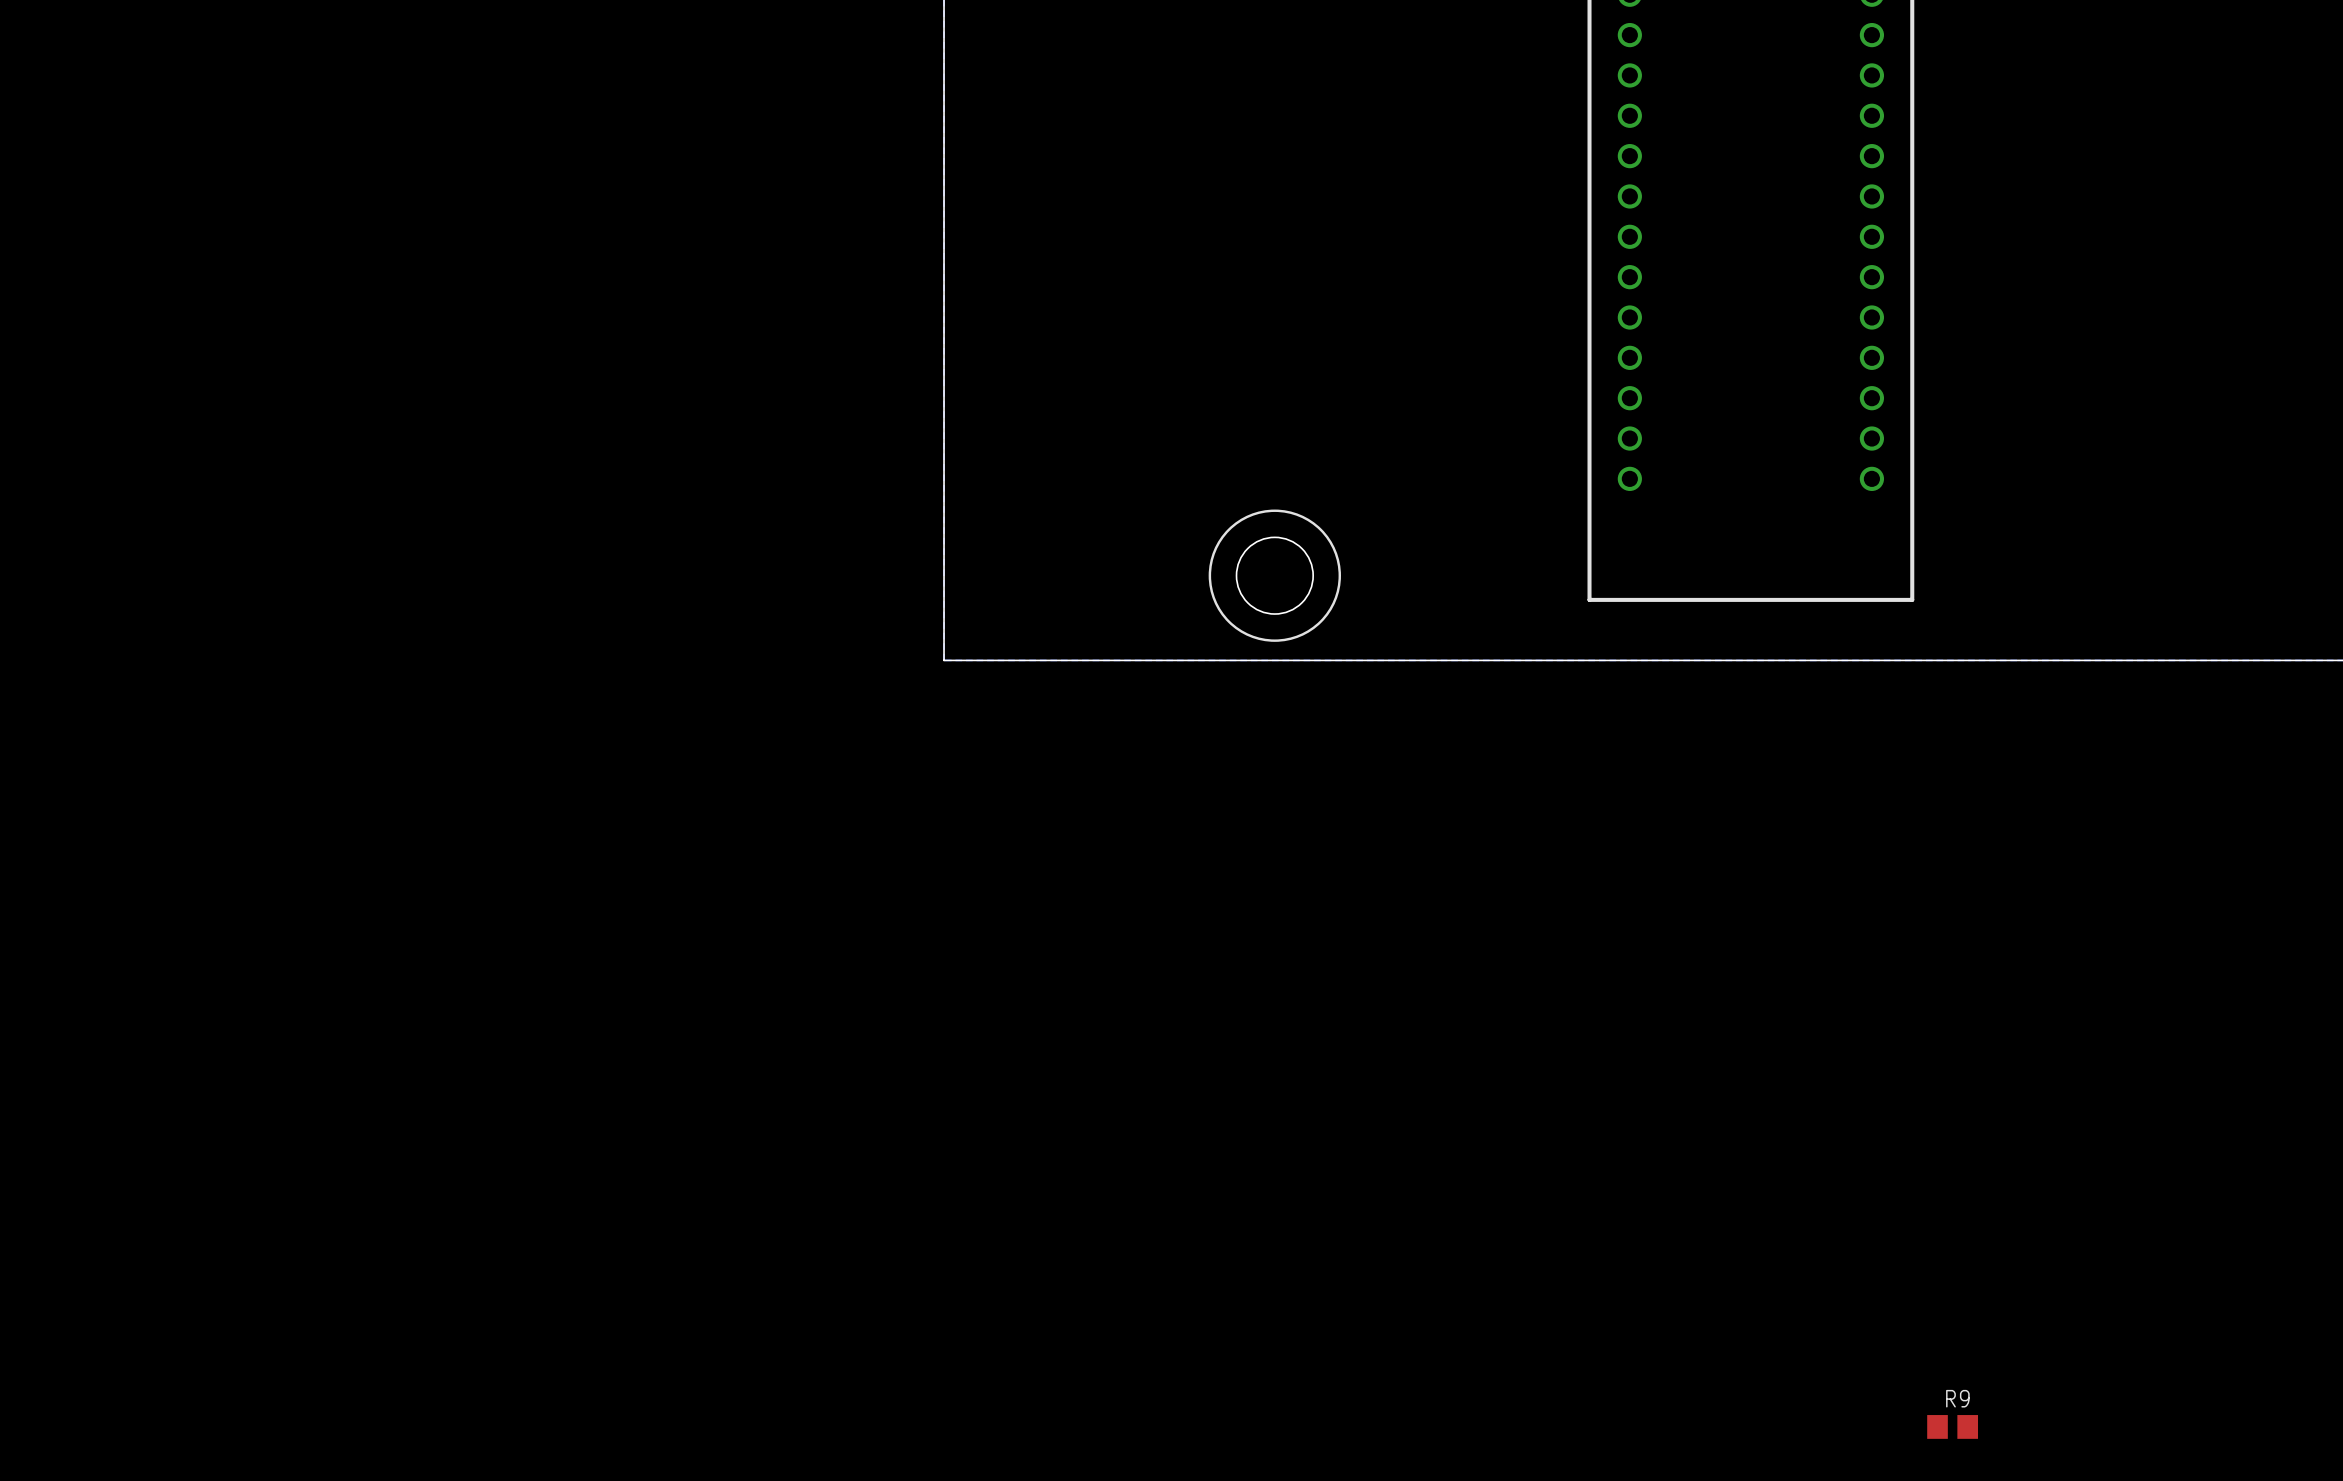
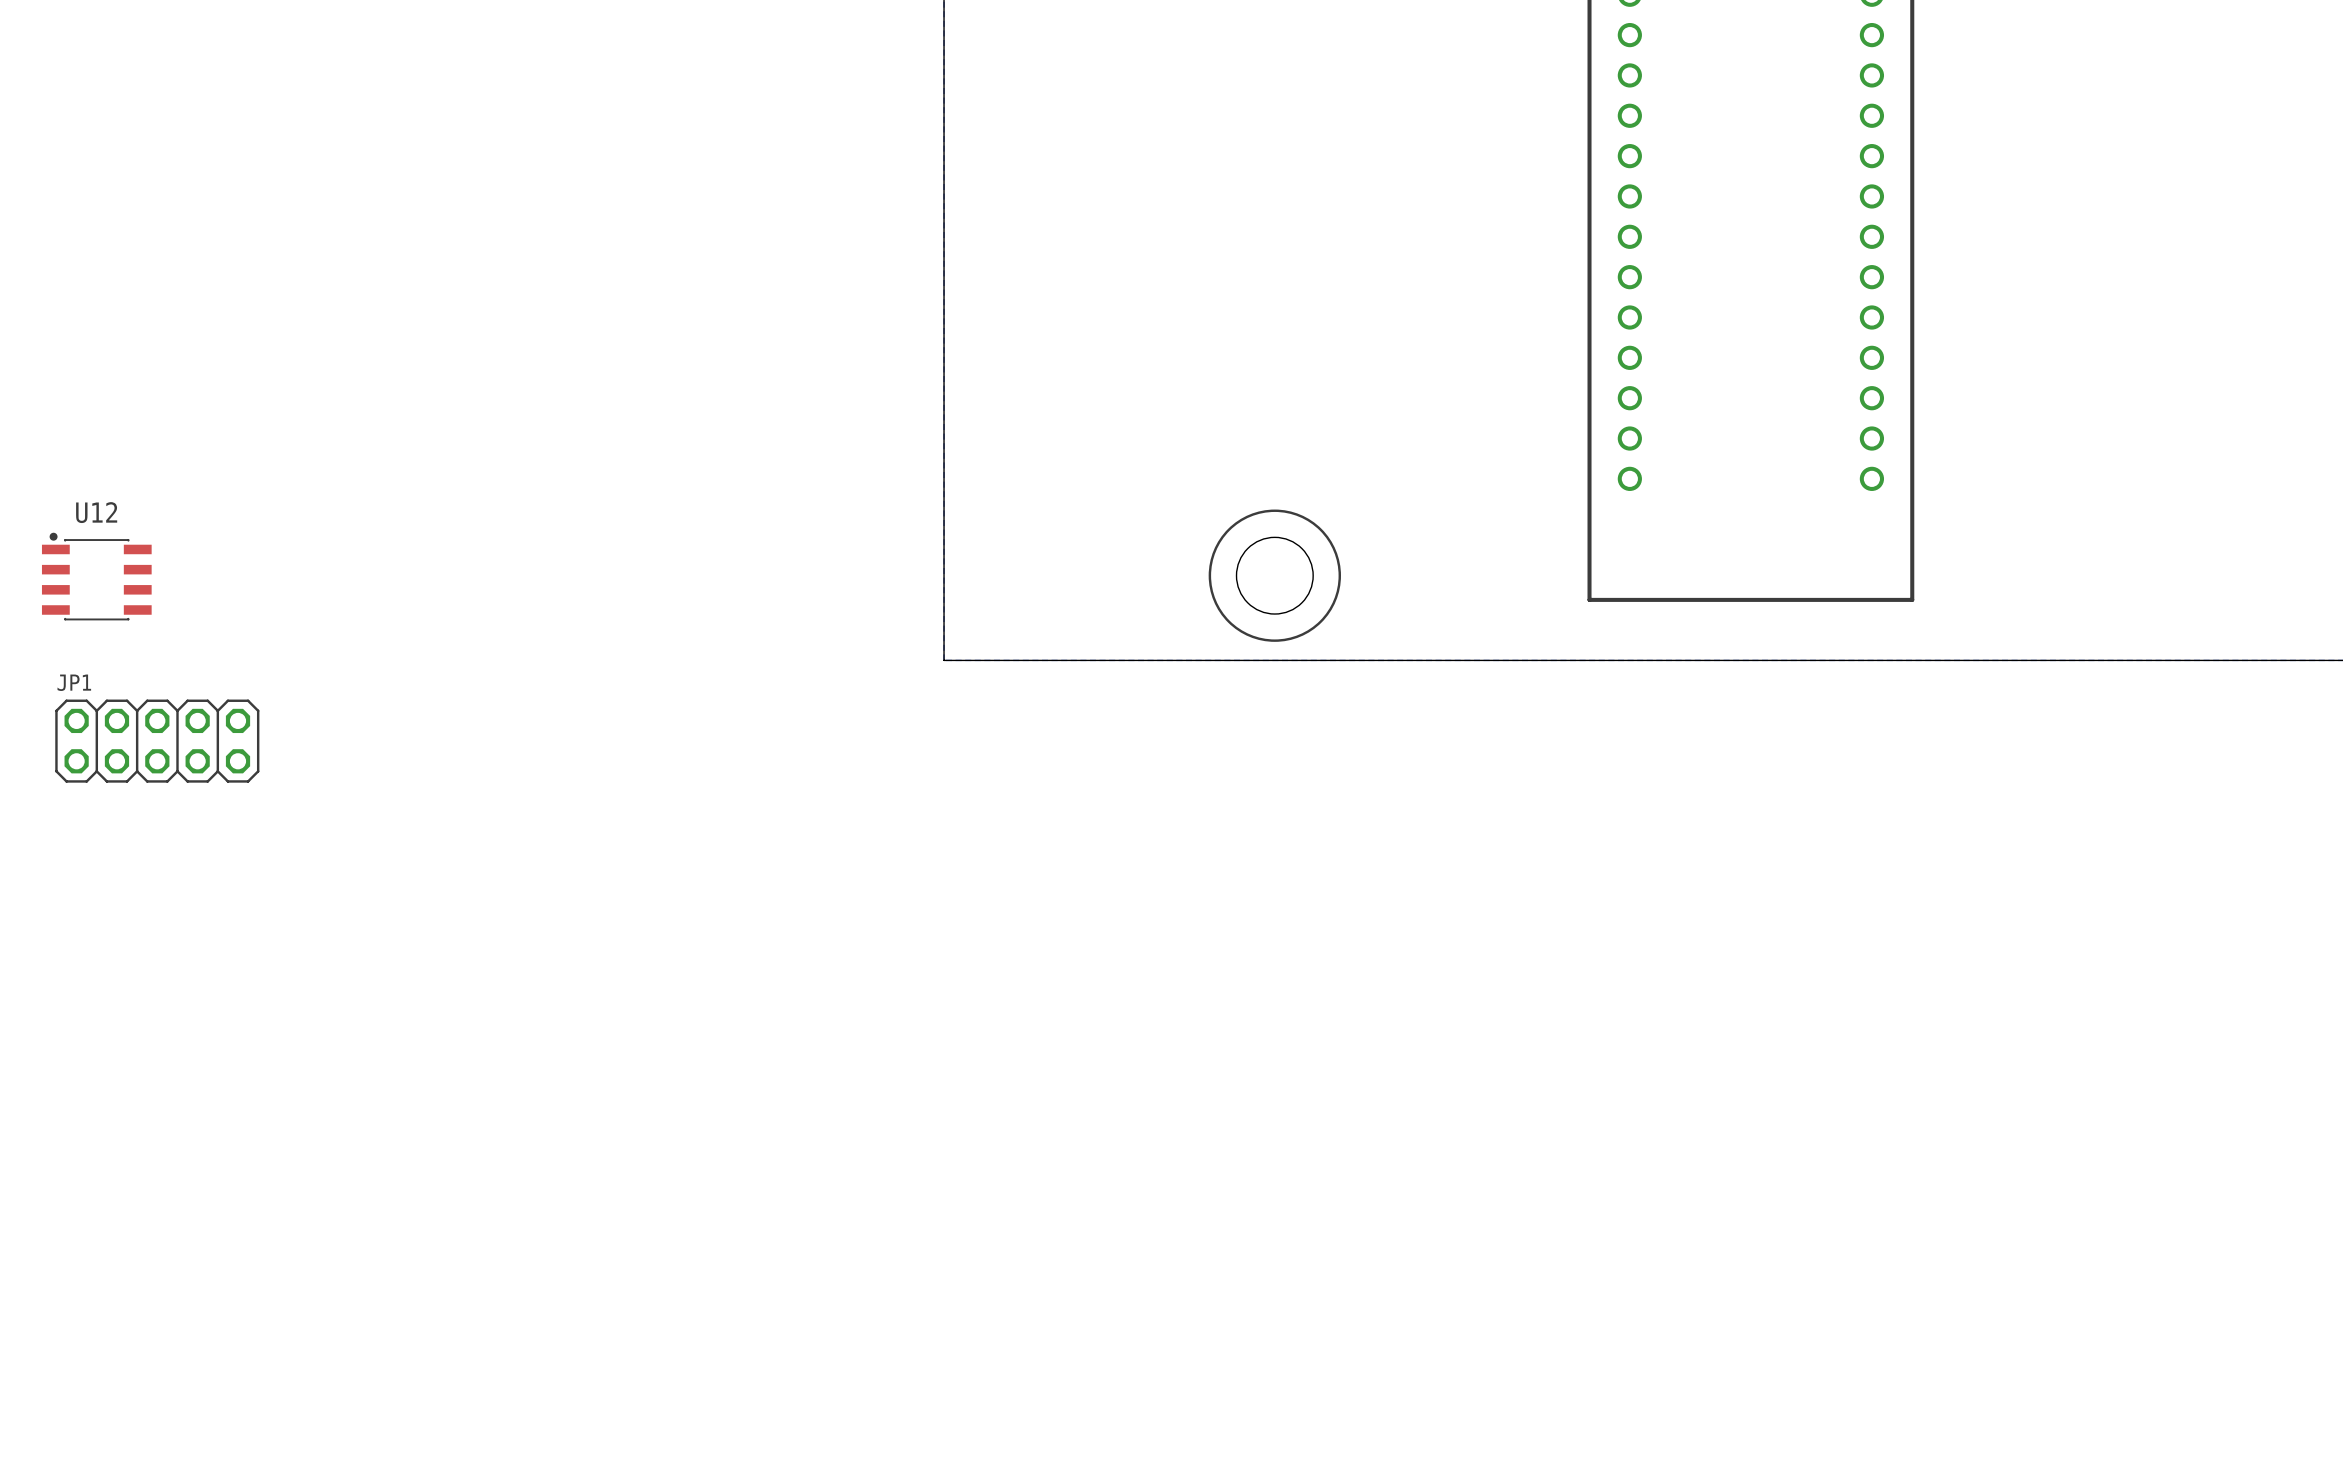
U12: none -> (96, 576)
JP1: none -> (157, 741)
R9: (1952, 1426) -> none

